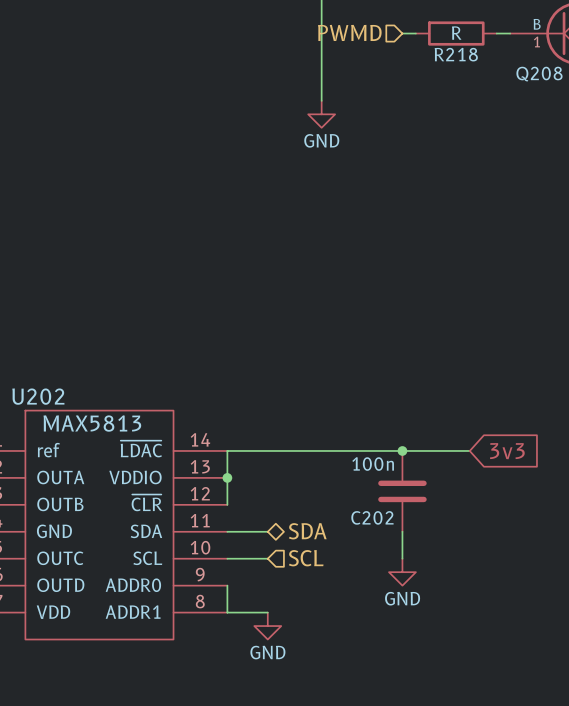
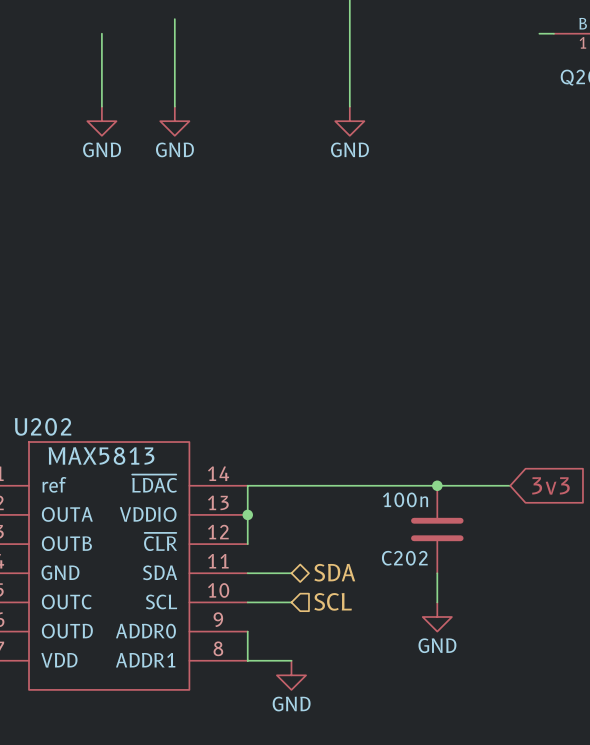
wire: none -> (174, 19) (174, 106)
hierarchical label: PWMD (349, 32) -> none
wire: none -> (101, 33) (101, 106)
wire: (402, 33) (415, 33) -> none
R218: R (456, 33) -> none
power symbol: none -> GND (101, 121)
power symbol: none -> GND (174, 121)

